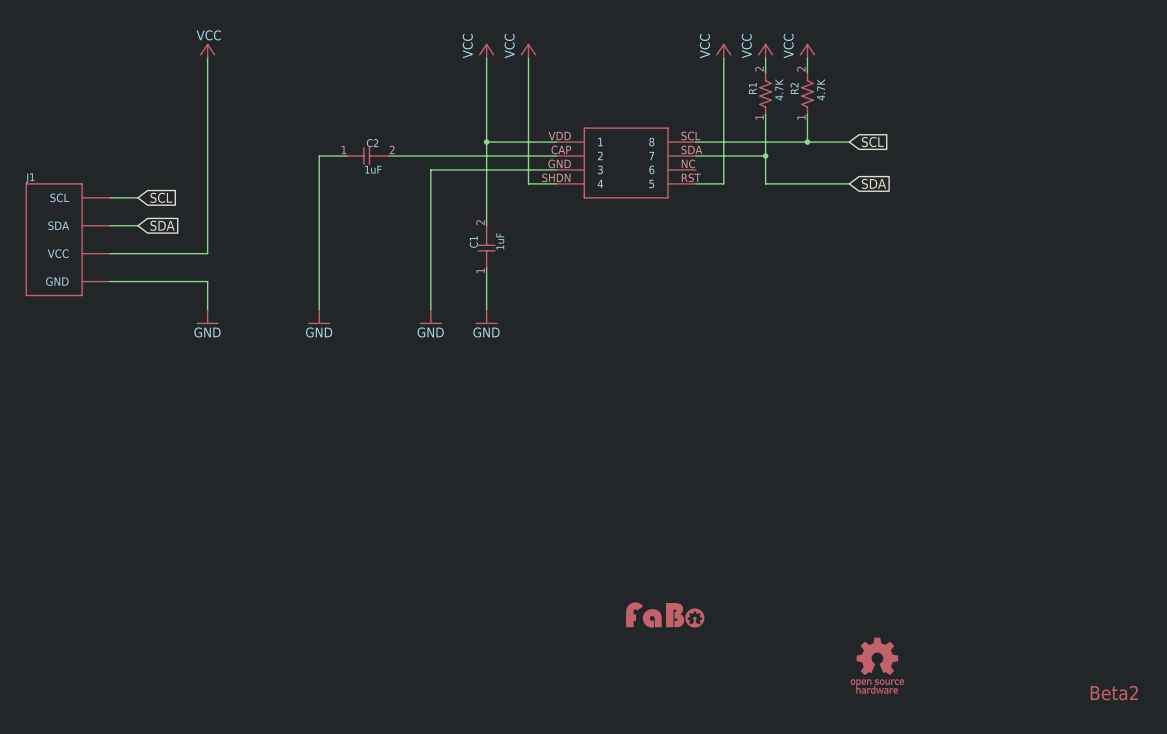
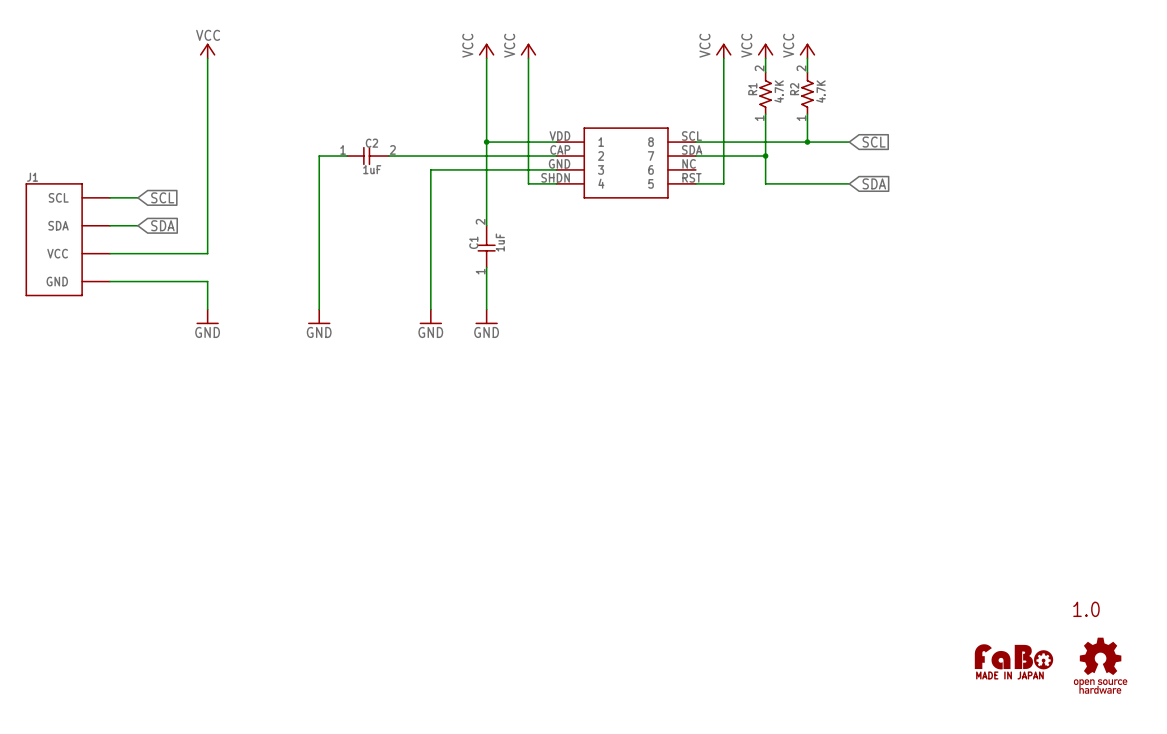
text: none -> 1.0 (1086, 609)
part: (665, 614) -> none
part: none -> (1013, 656)
part: (877, 665) -> none
part: none -> (1100, 665)
text: Beta2 (1114, 693) -> none

